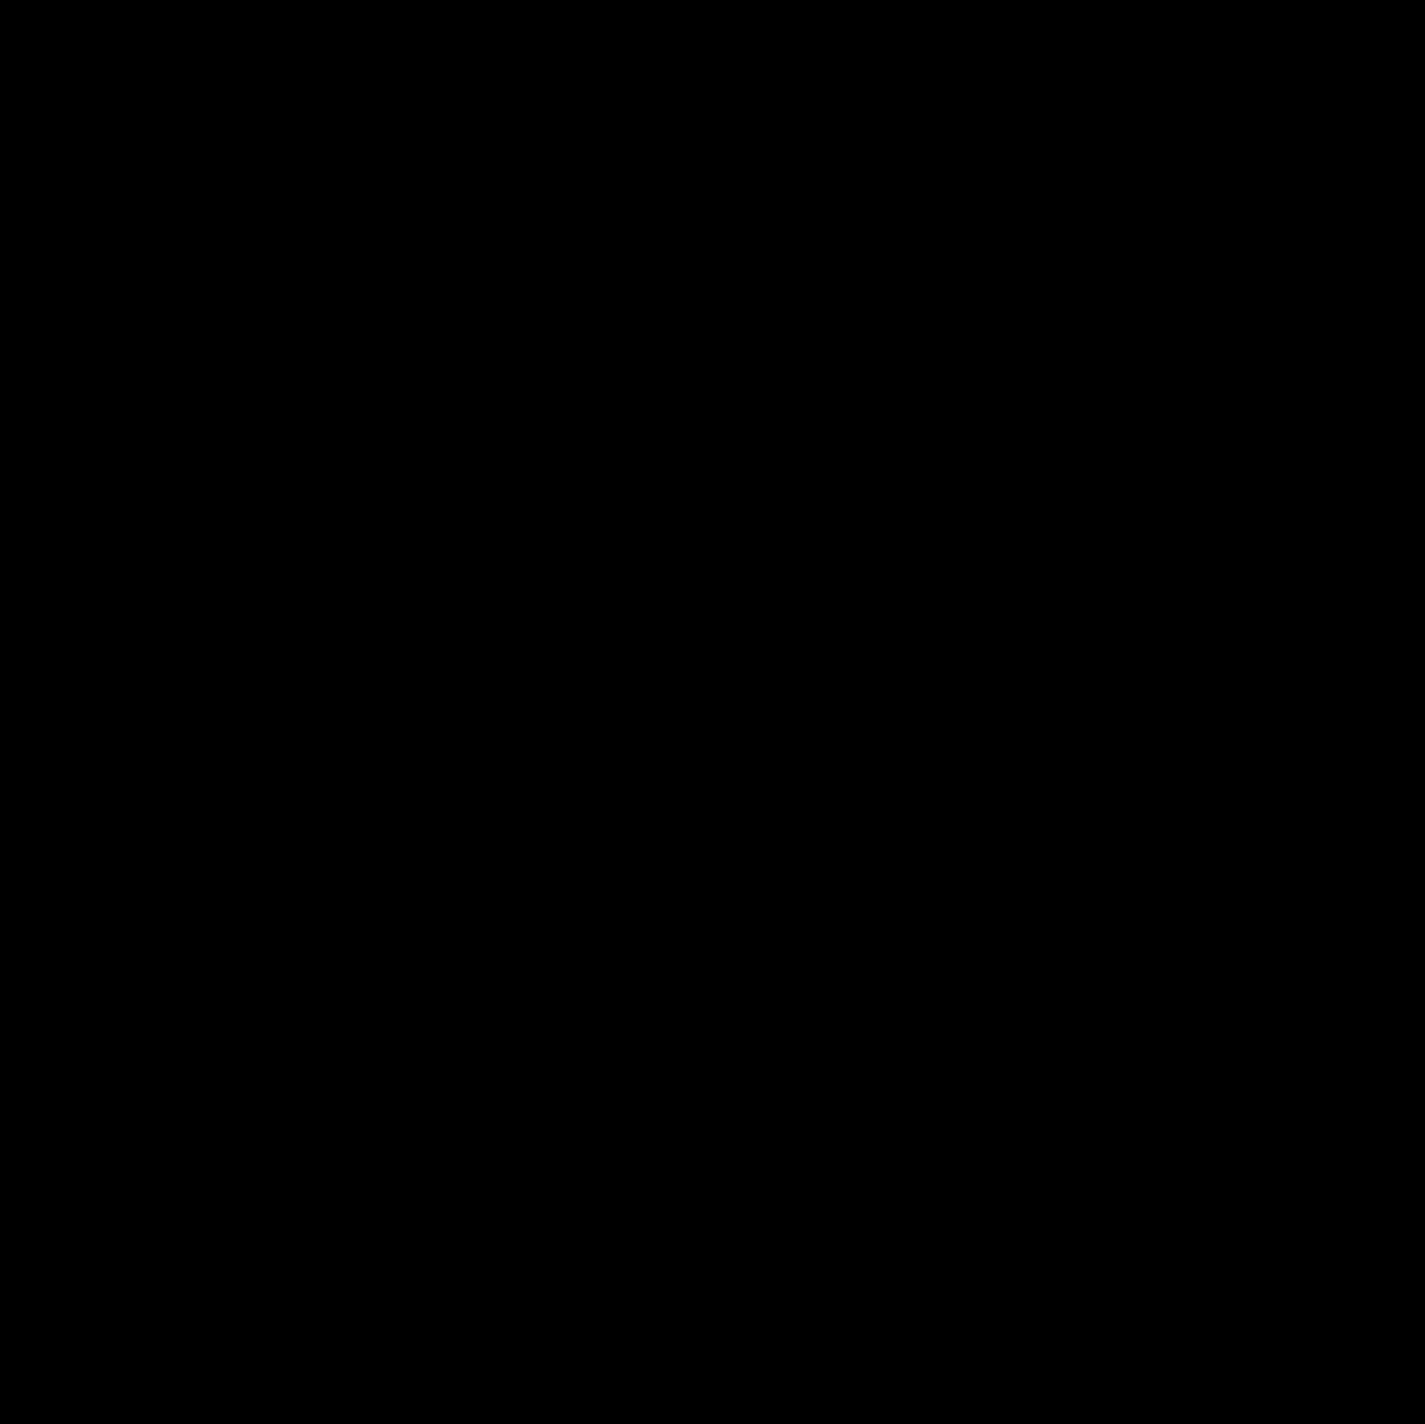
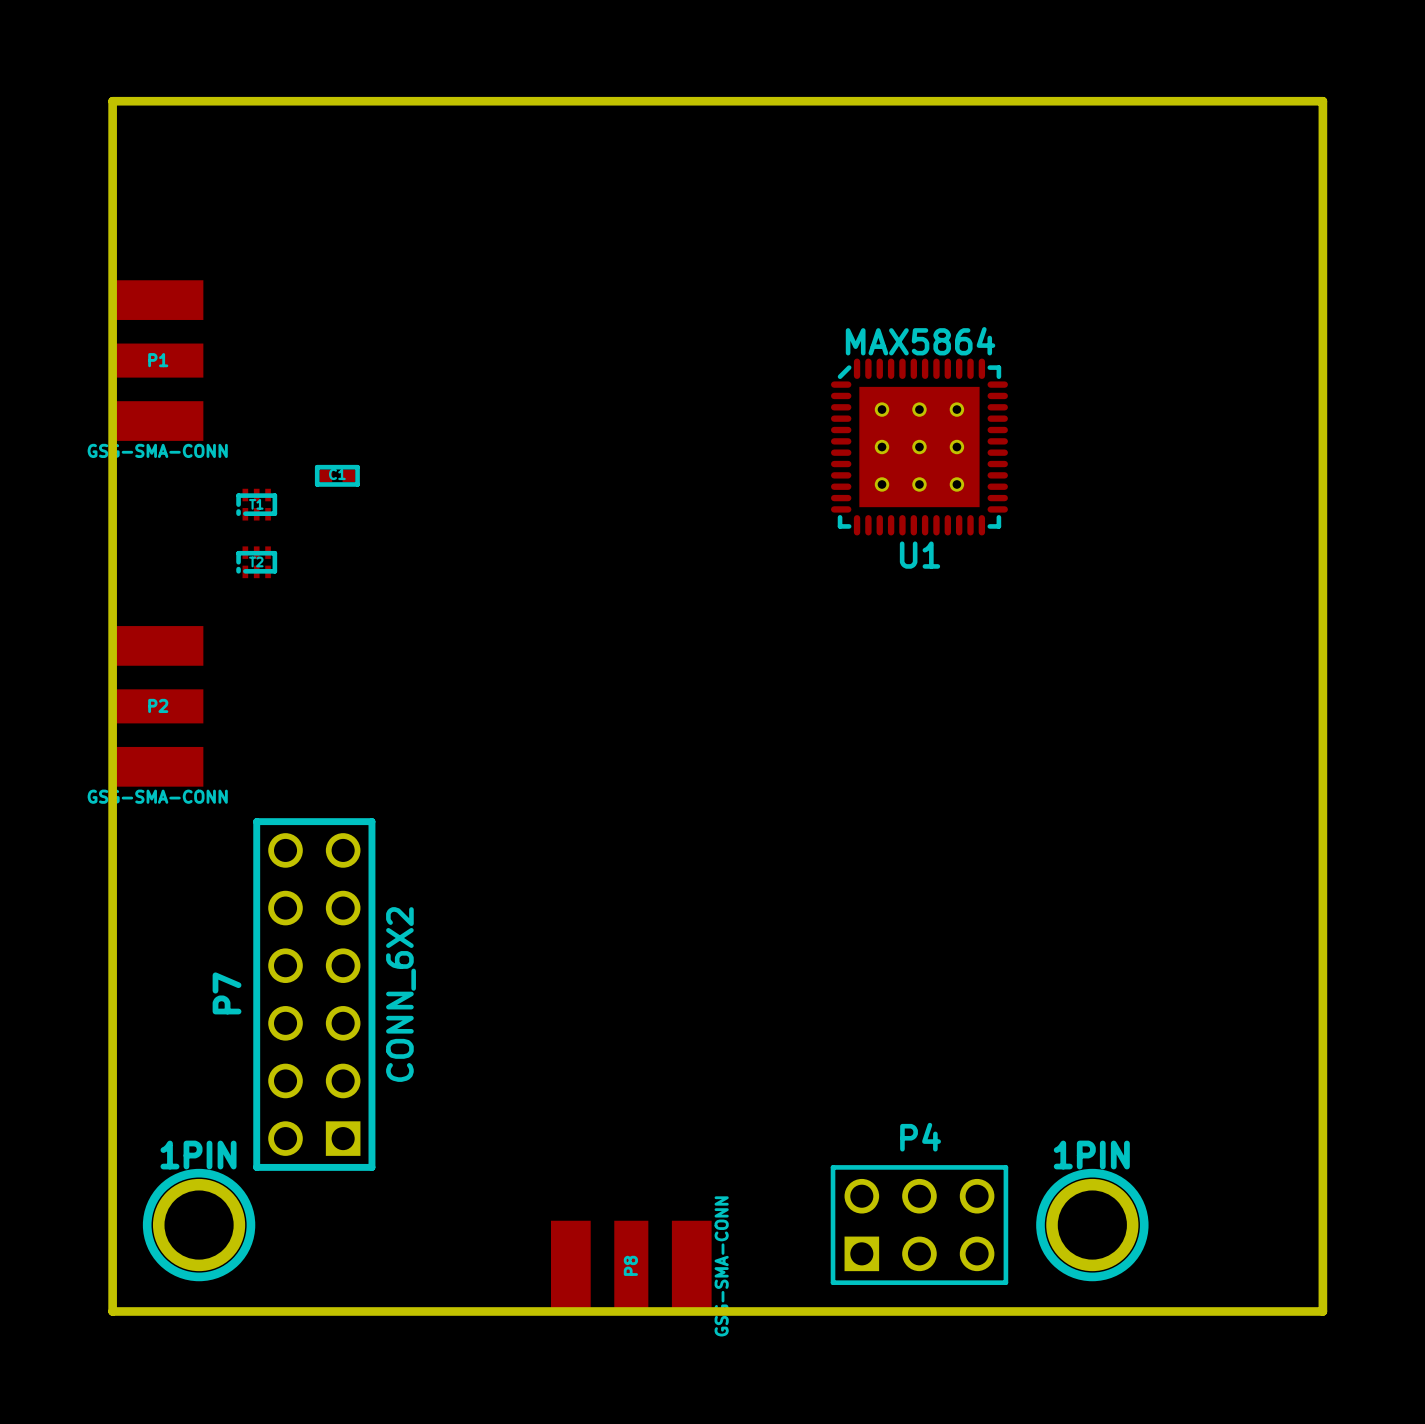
board edge: none -> (112, 101) (1322, 101) (1322, 1311) (112, 1311) (112, 101)
P1: none -> GSG-SMA-CONN (157, 360)
U1: none -> MAX5864 (919, 447)
C1: none -> (337, 475)
T1: none -> (256, 504)
T2: none -> (256, 562)
P2: none -> GSG-SMA-CONN (157, 706)
P7: none -> CONN_6X2 (314, 994)
1PIN: none -> (199, 1225)
P4: none -> (919, 1225)
1PIN: none -> (1092, 1225)
P8: none -> GSG-SMA-CONN (631, 1266)

